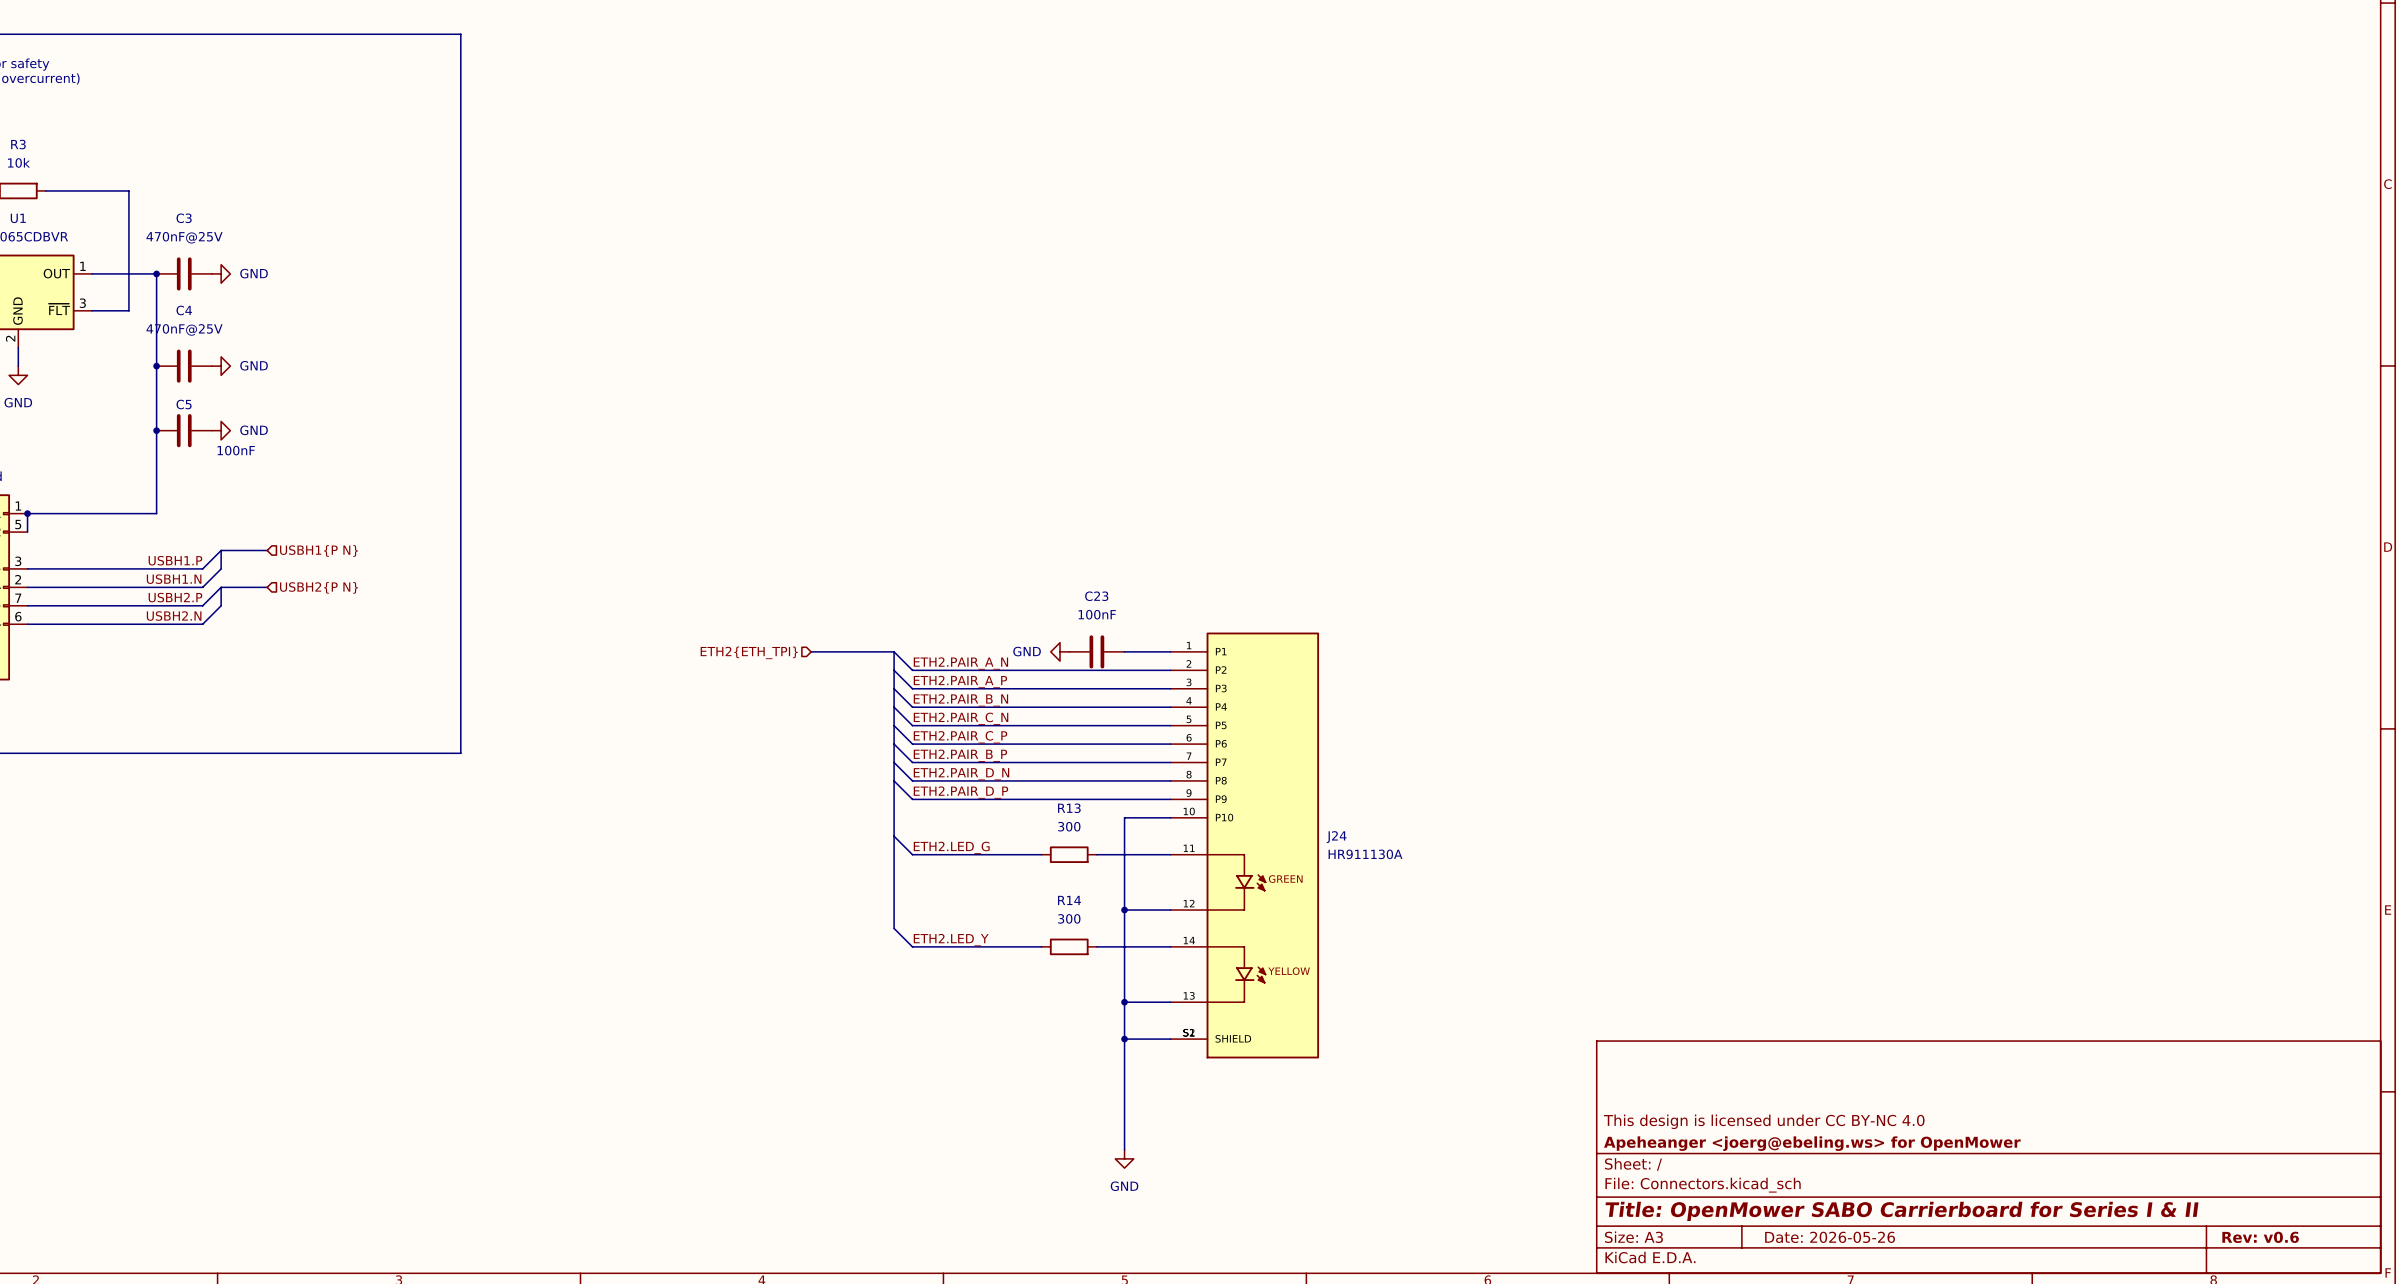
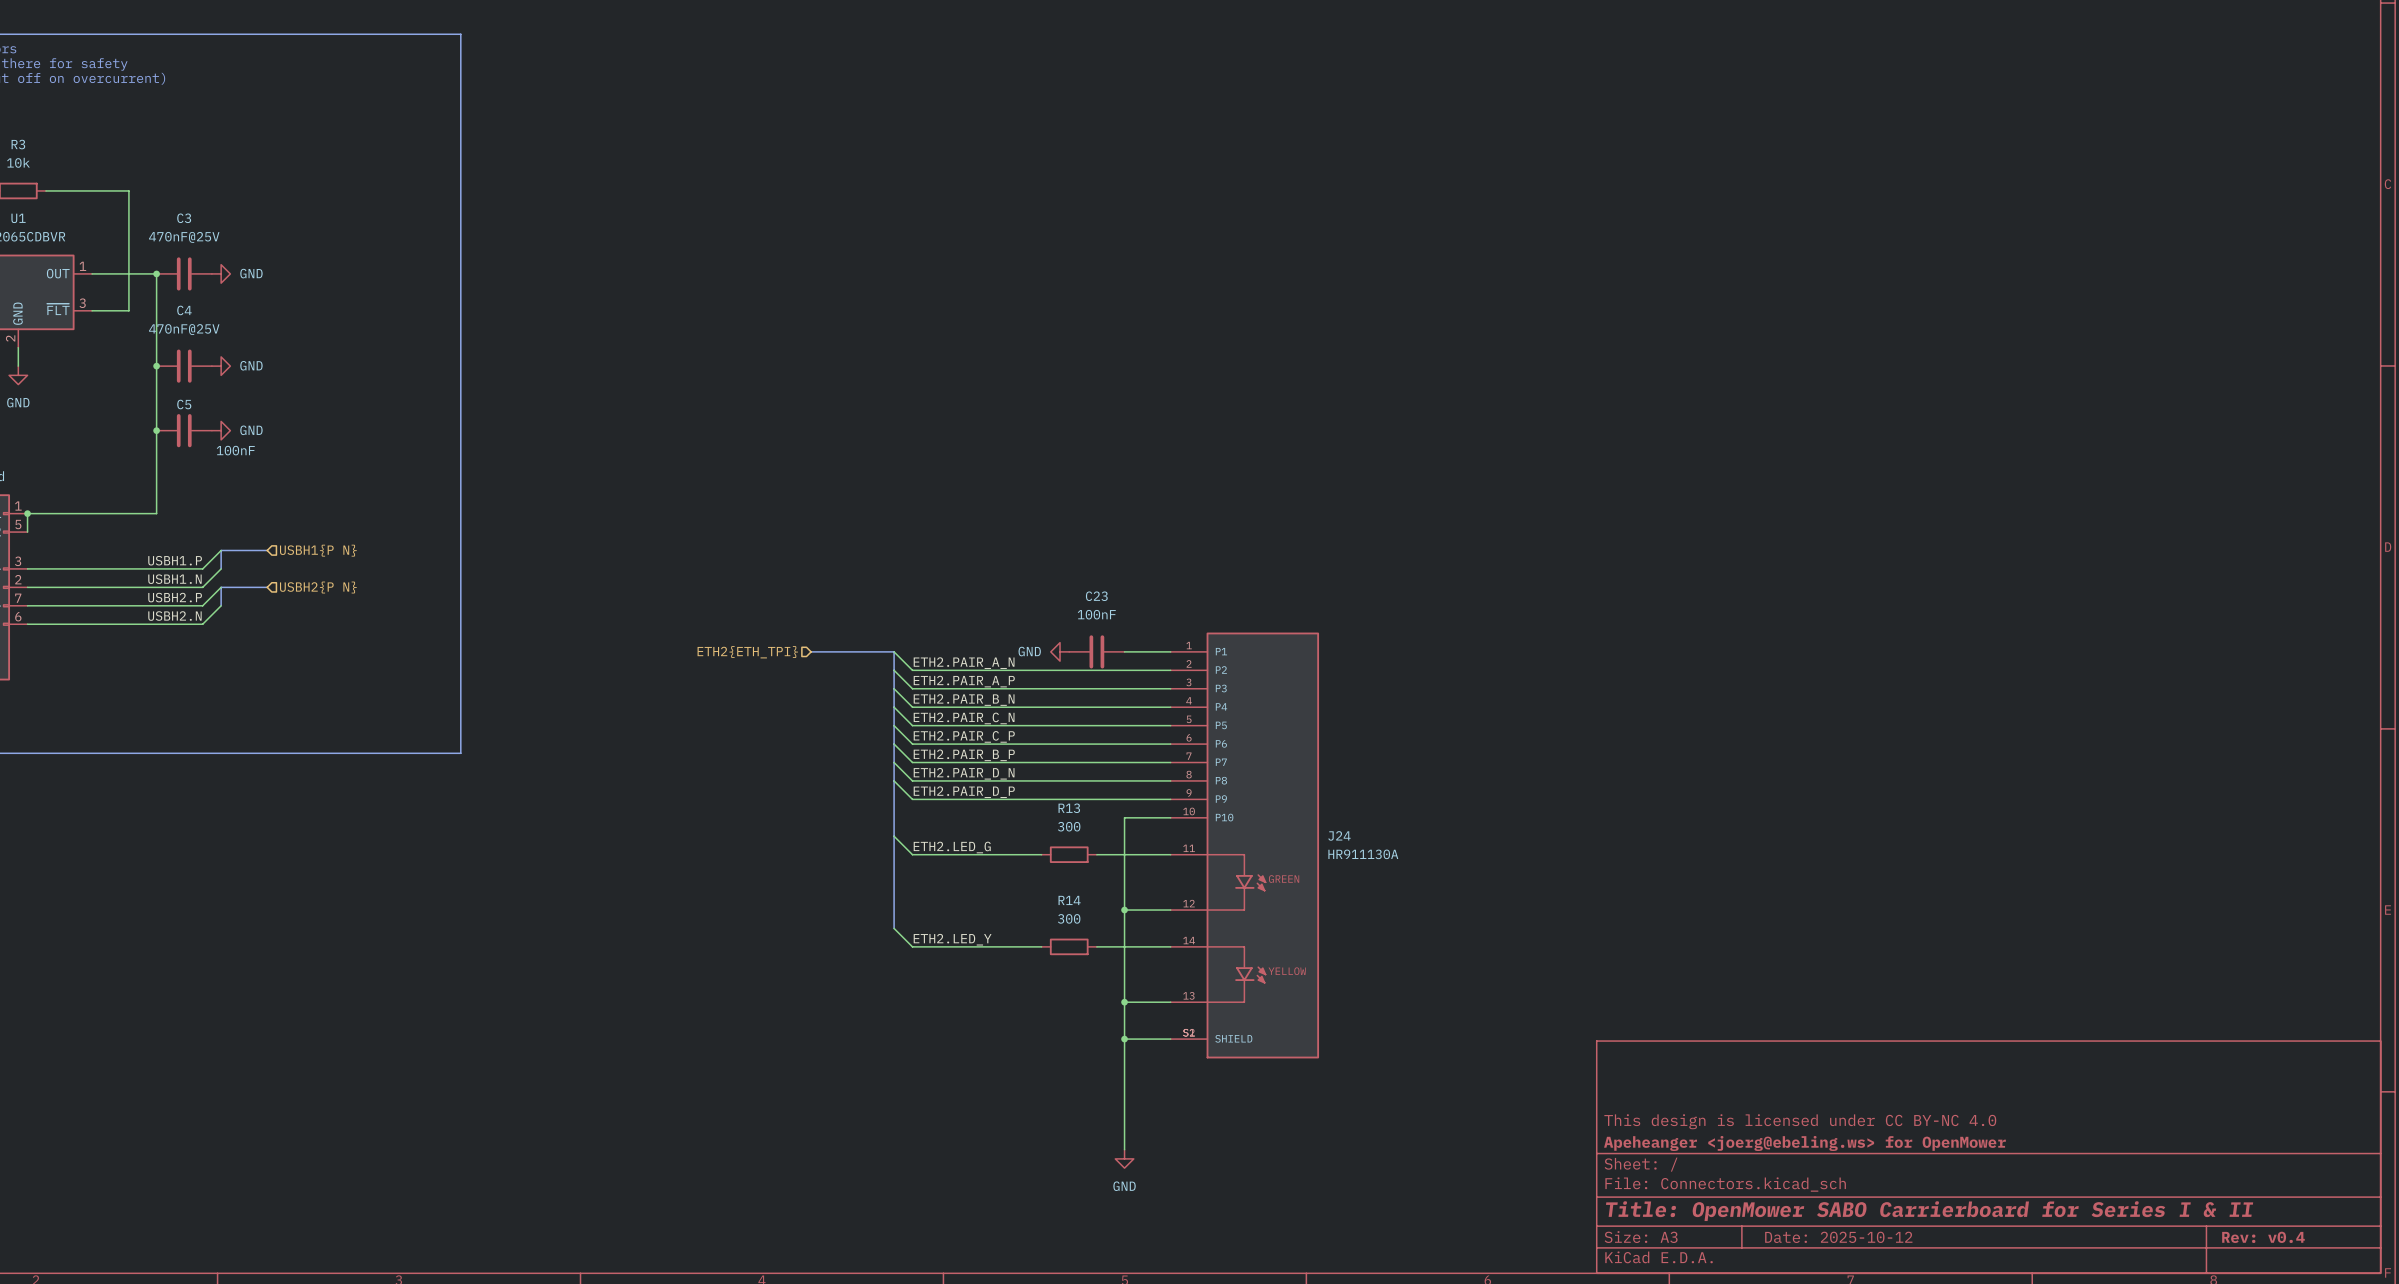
title block: Date: 2026-05-26 (1830, 1237) -> Date: 2025-10-12 (1838, 1237)
title block: Rev: v0.6 (2260, 1237) -> Rev: v0.4 (2263, 1237)

